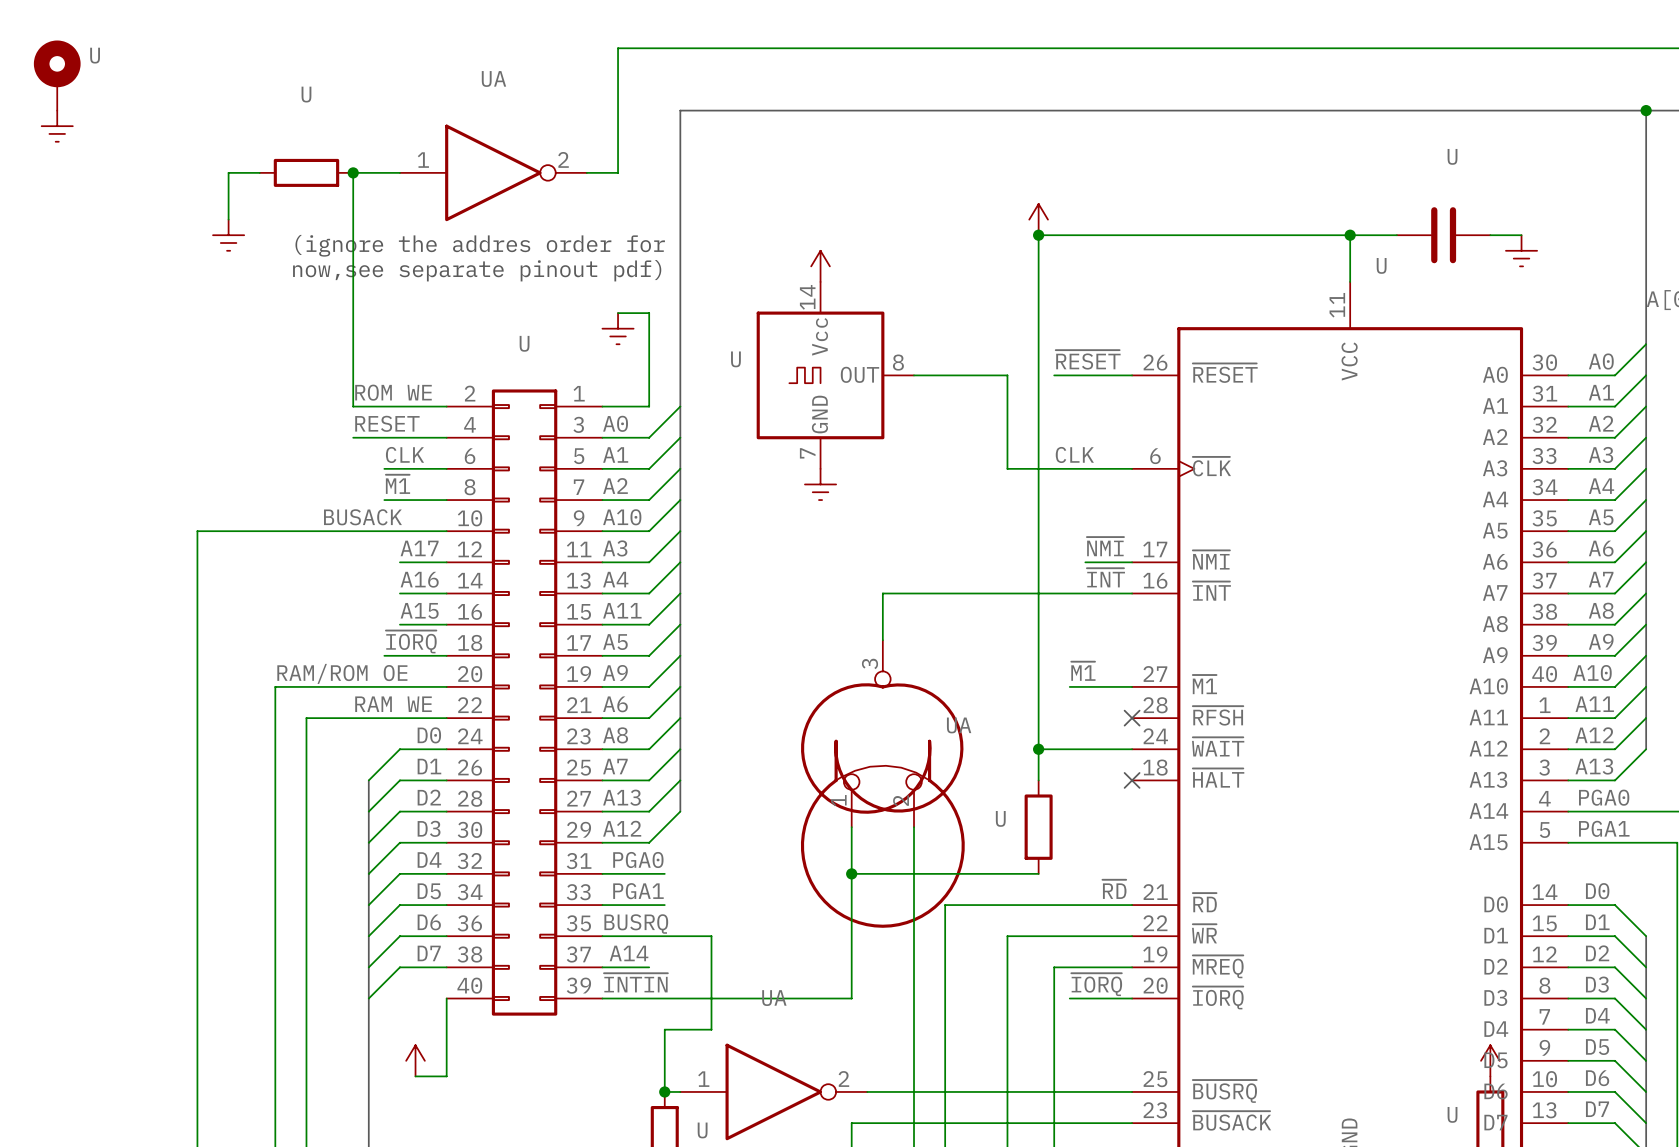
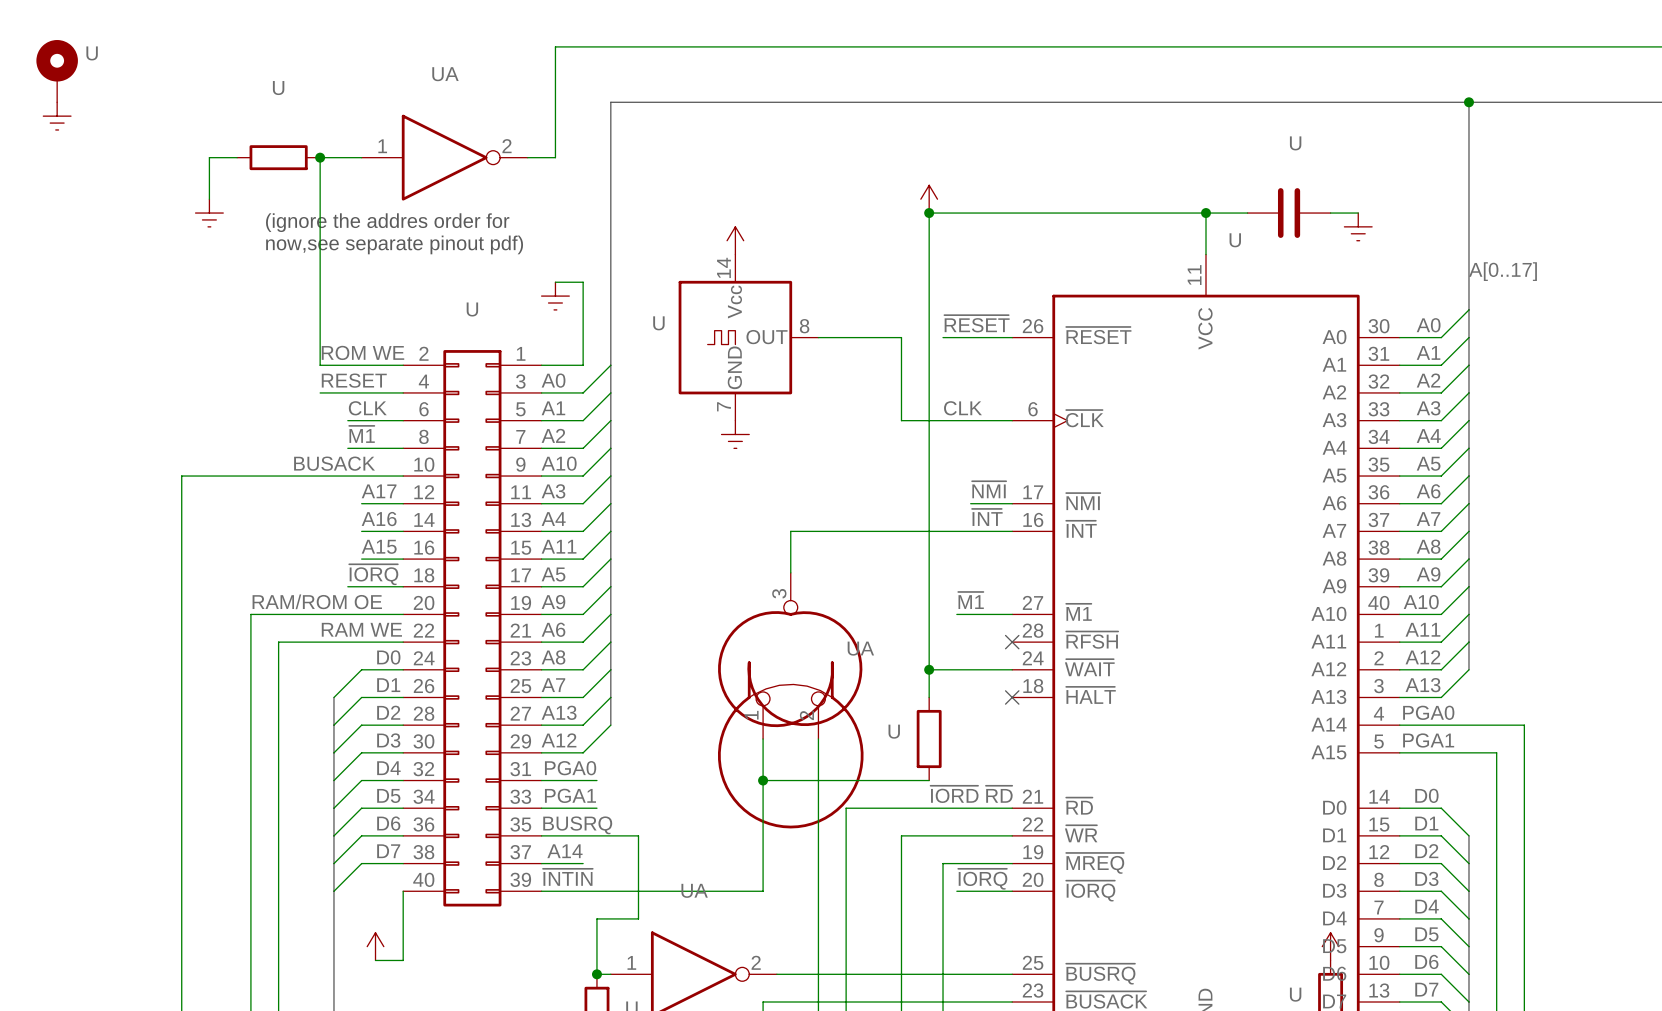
label: none -> ~{IORD} (954, 794)

